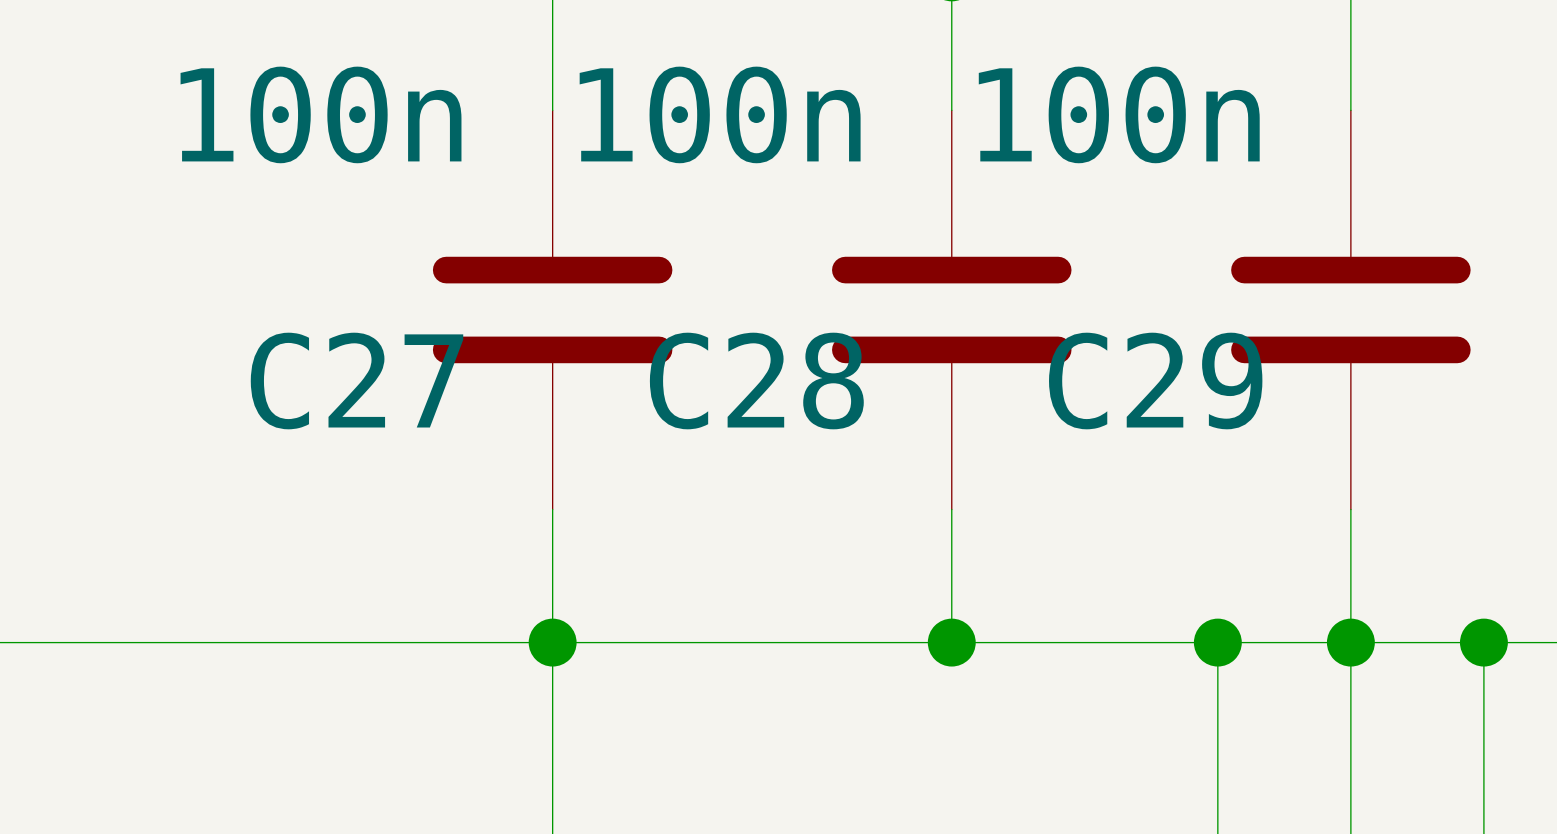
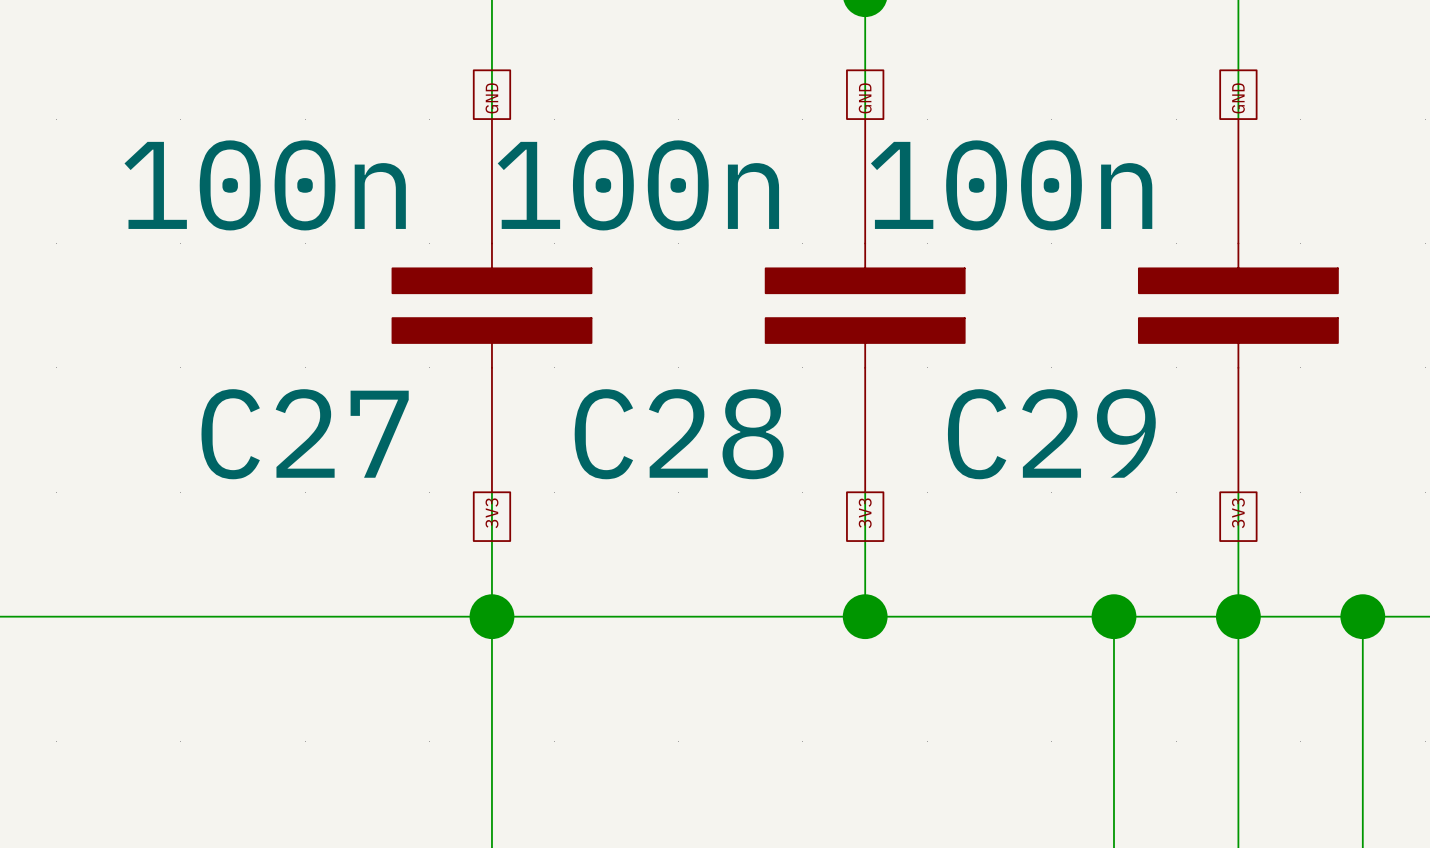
global label: none -> GND (491, 98)
global label: none -> GND (865, 98)
global label: none -> GND (1238, 98)
C27 symbol: [432, 110, 673, 510] -> [392, 119, 592, 493]
C28 symbol: [832, 110, 1072, 510] -> [765, 119, 965, 493]
C29 symbol: [1231, 110, 1471, 510] -> [1138, 119, 1338, 493]
C27 value position: 100n (321, 114) -> 100n (265, 185)
C28 value position: 100n (720, 114) -> 100n (638, 185)
C29 value position: 100n (1119, 114) -> 100n (1011, 185)
C27 name position: C27 (357, 381) -> C27 (305, 434)
C28 name position: C28 (756, 381) -> C28 (679, 434)
C29 name position: C29 (1155, 381) -> C29 (1051, 434)
global label: none -> 3V3 (491, 513)
global label: none -> 3V3 (865, 513)
global label: none -> 3V3 (1238, 513)

